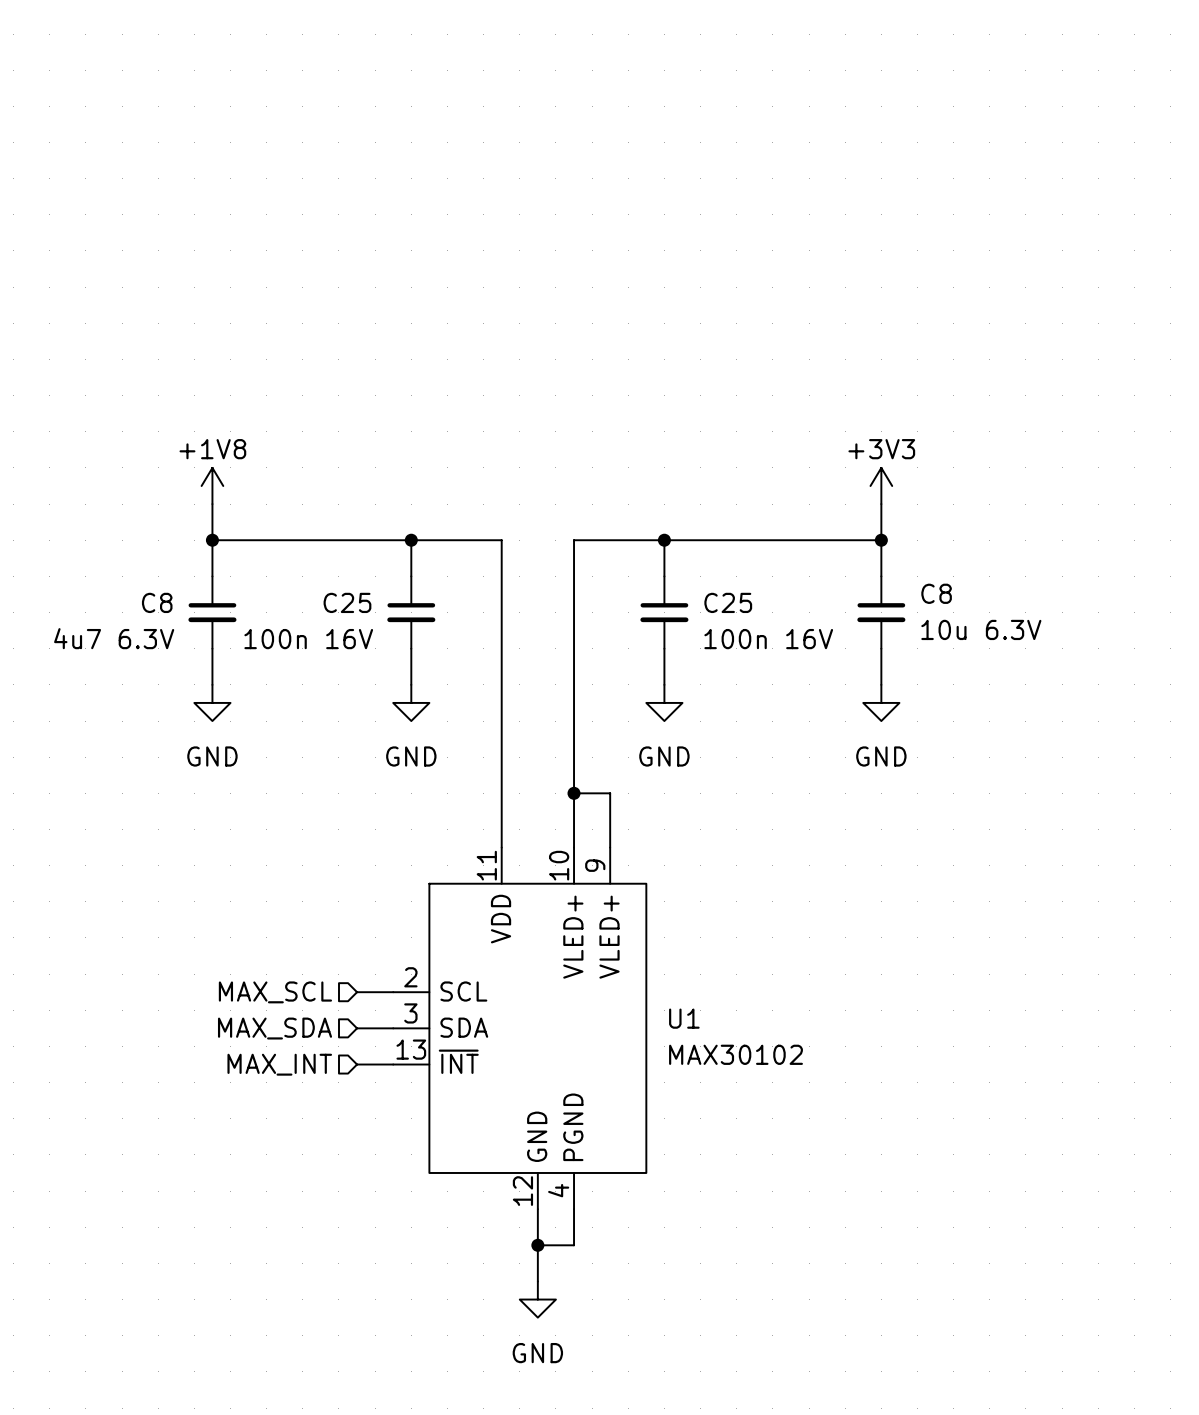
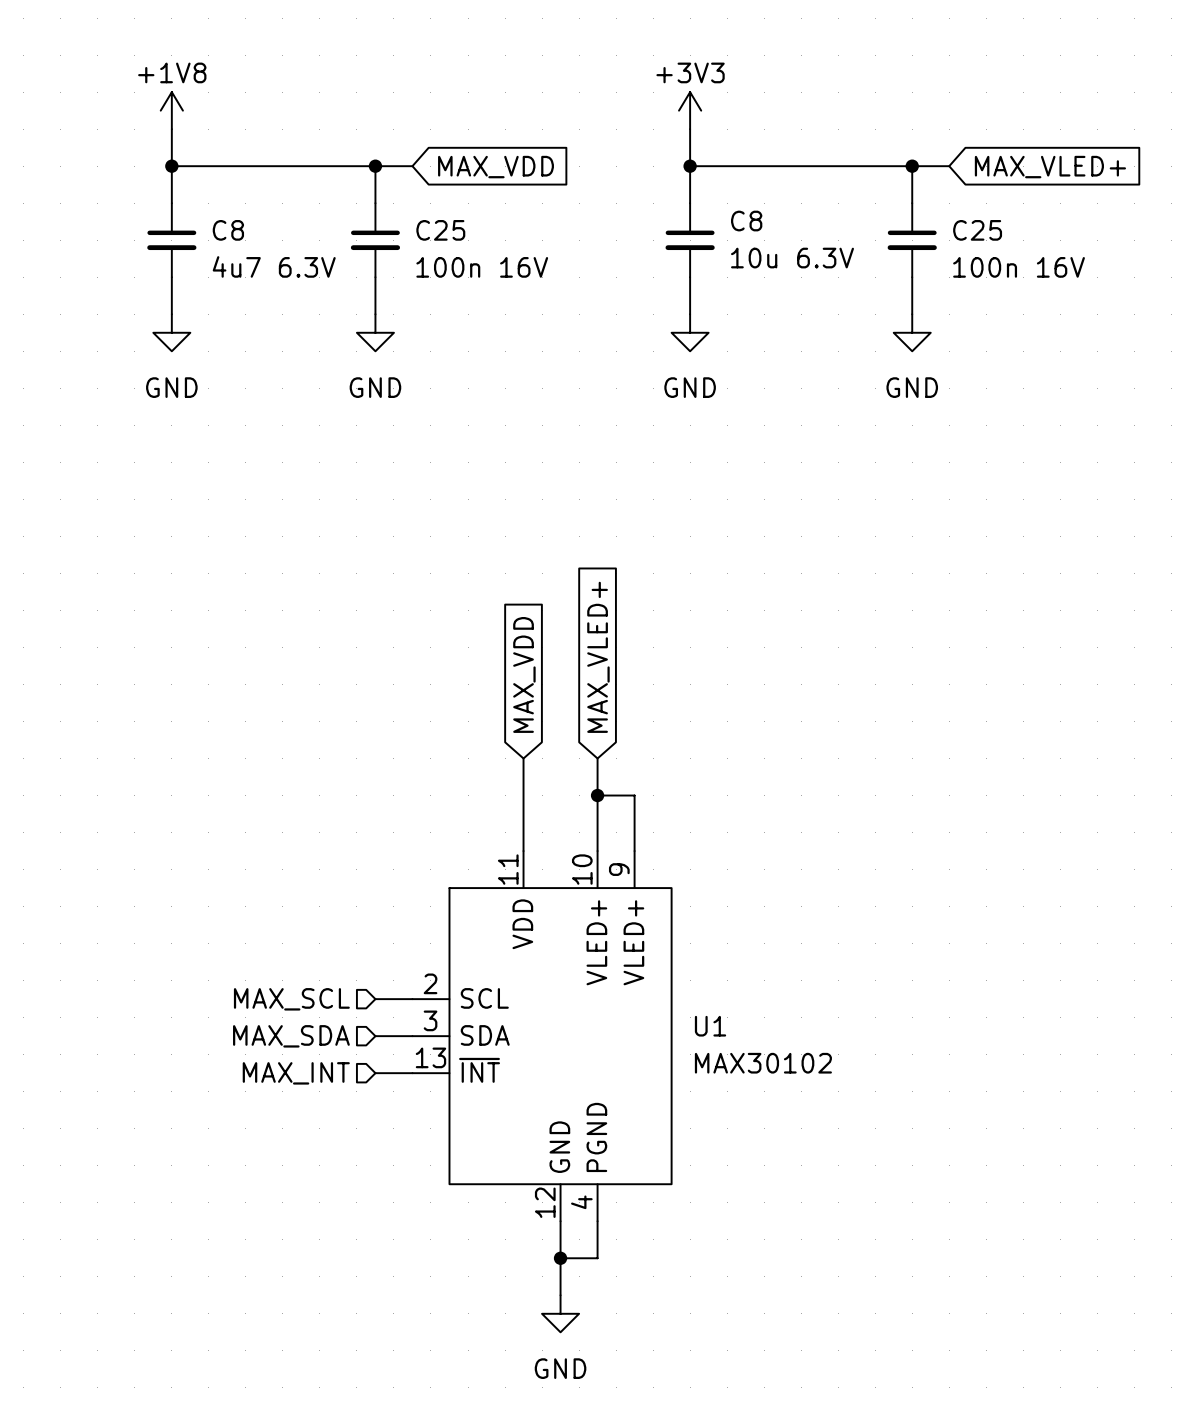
power symbol: none -> +1V8 (171, 110)
power symbol: none -> +3V3 (690, 110)
wire: none -> (171, 129) (171, 203)
wire: none -> (690, 129) (690, 203)
wire: none -> (171, 166) (412, 166)
junction: none -> (171, 166)
wire: none -> (375, 166) (375, 203)
junction: none -> (375, 166)
wire: none -> (690, 166) (949, 166)
junction: none -> (690, 166)
wire: none -> (912, 166) (912, 203)
junction: none -> (912, 166)
global label: none -> MAX_VDD (496, 167)
global label: none -> MAX_VLED+ (1050, 167)
C8: none -> 4u7 6.3V (171, 240)
C25: none -> 100n 16V (375, 240)
C8: none -> 10u 6.3V (690, 240)
C25: none -> 100n 16V (912, 240)
wire: none -> (171, 277) (171, 314)
wire: none -> (912, 277) (912, 314)
power symbol: none -> GND (171, 332)
power symbol: none -> GND (375, 332)
power symbol: none -> GND (690, 332)
power symbol: none -> GND (912, 332)
power symbol: +1V8 (212, 485) -> none
power symbol: +3V3 (881, 485) -> none
wire: (212, 504) (212, 576) -> none
wire: (881, 504) (881, 576) -> none
wire: (212, 540) (501, 540) (501, 757) -> none
junction: (212, 540) -> none
wire: (411, 540) (411, 576) -> (375, 277) (375, 314)
junction: (411, 540) -> none
wire: (664, 540) (664, 576) -> (690, 277) (690, 314)
junction: (664, 540) -> none
wire: (881, 540) (574, 540) (574, 757) -> none
junction: (881, 540) -> none
C8: 4u7 6.3V (212, 612) -> none
C25: 100n 16V (411, 612) -> none
C25: 100n 16V (664, 612) -> none
C8: 10u 6.3V (881, 612) -> none
wire: (212, 648) (212, 684) -> none
wire: (411, 648) (411, 684) -> none
wire: (664, 648) (664, 684) -> none
wire: (881, 648) (881, 684) -> none
global label: none -> MAX_VLED+ (598, 657)
global label: none -> MAX_VDD (524, 674)
power symbol: GND (212, 702) -> none
power symbol: GND (411, 702) -> none
power symbol: GND (664, 702) -> none
power symbol: GND (881, 702) -> none

